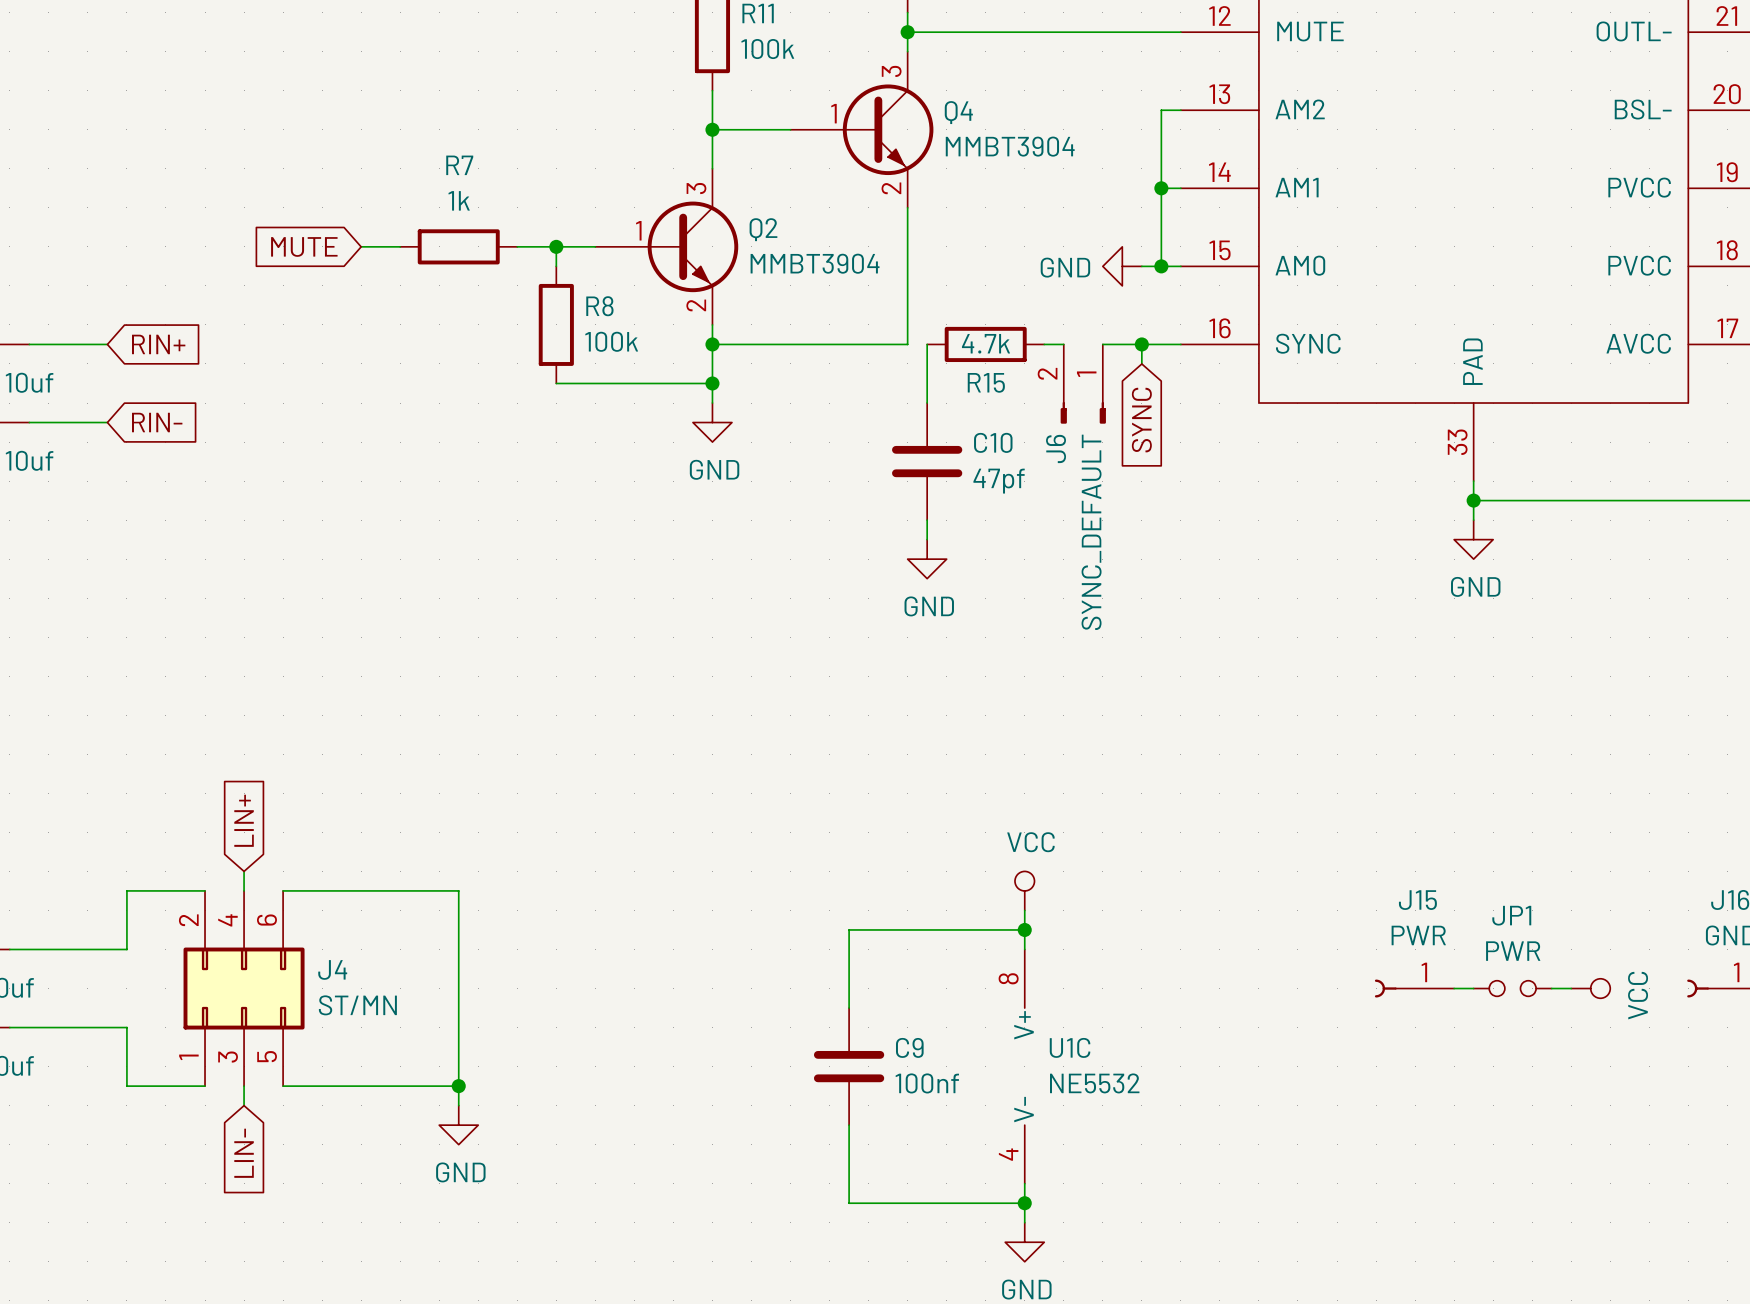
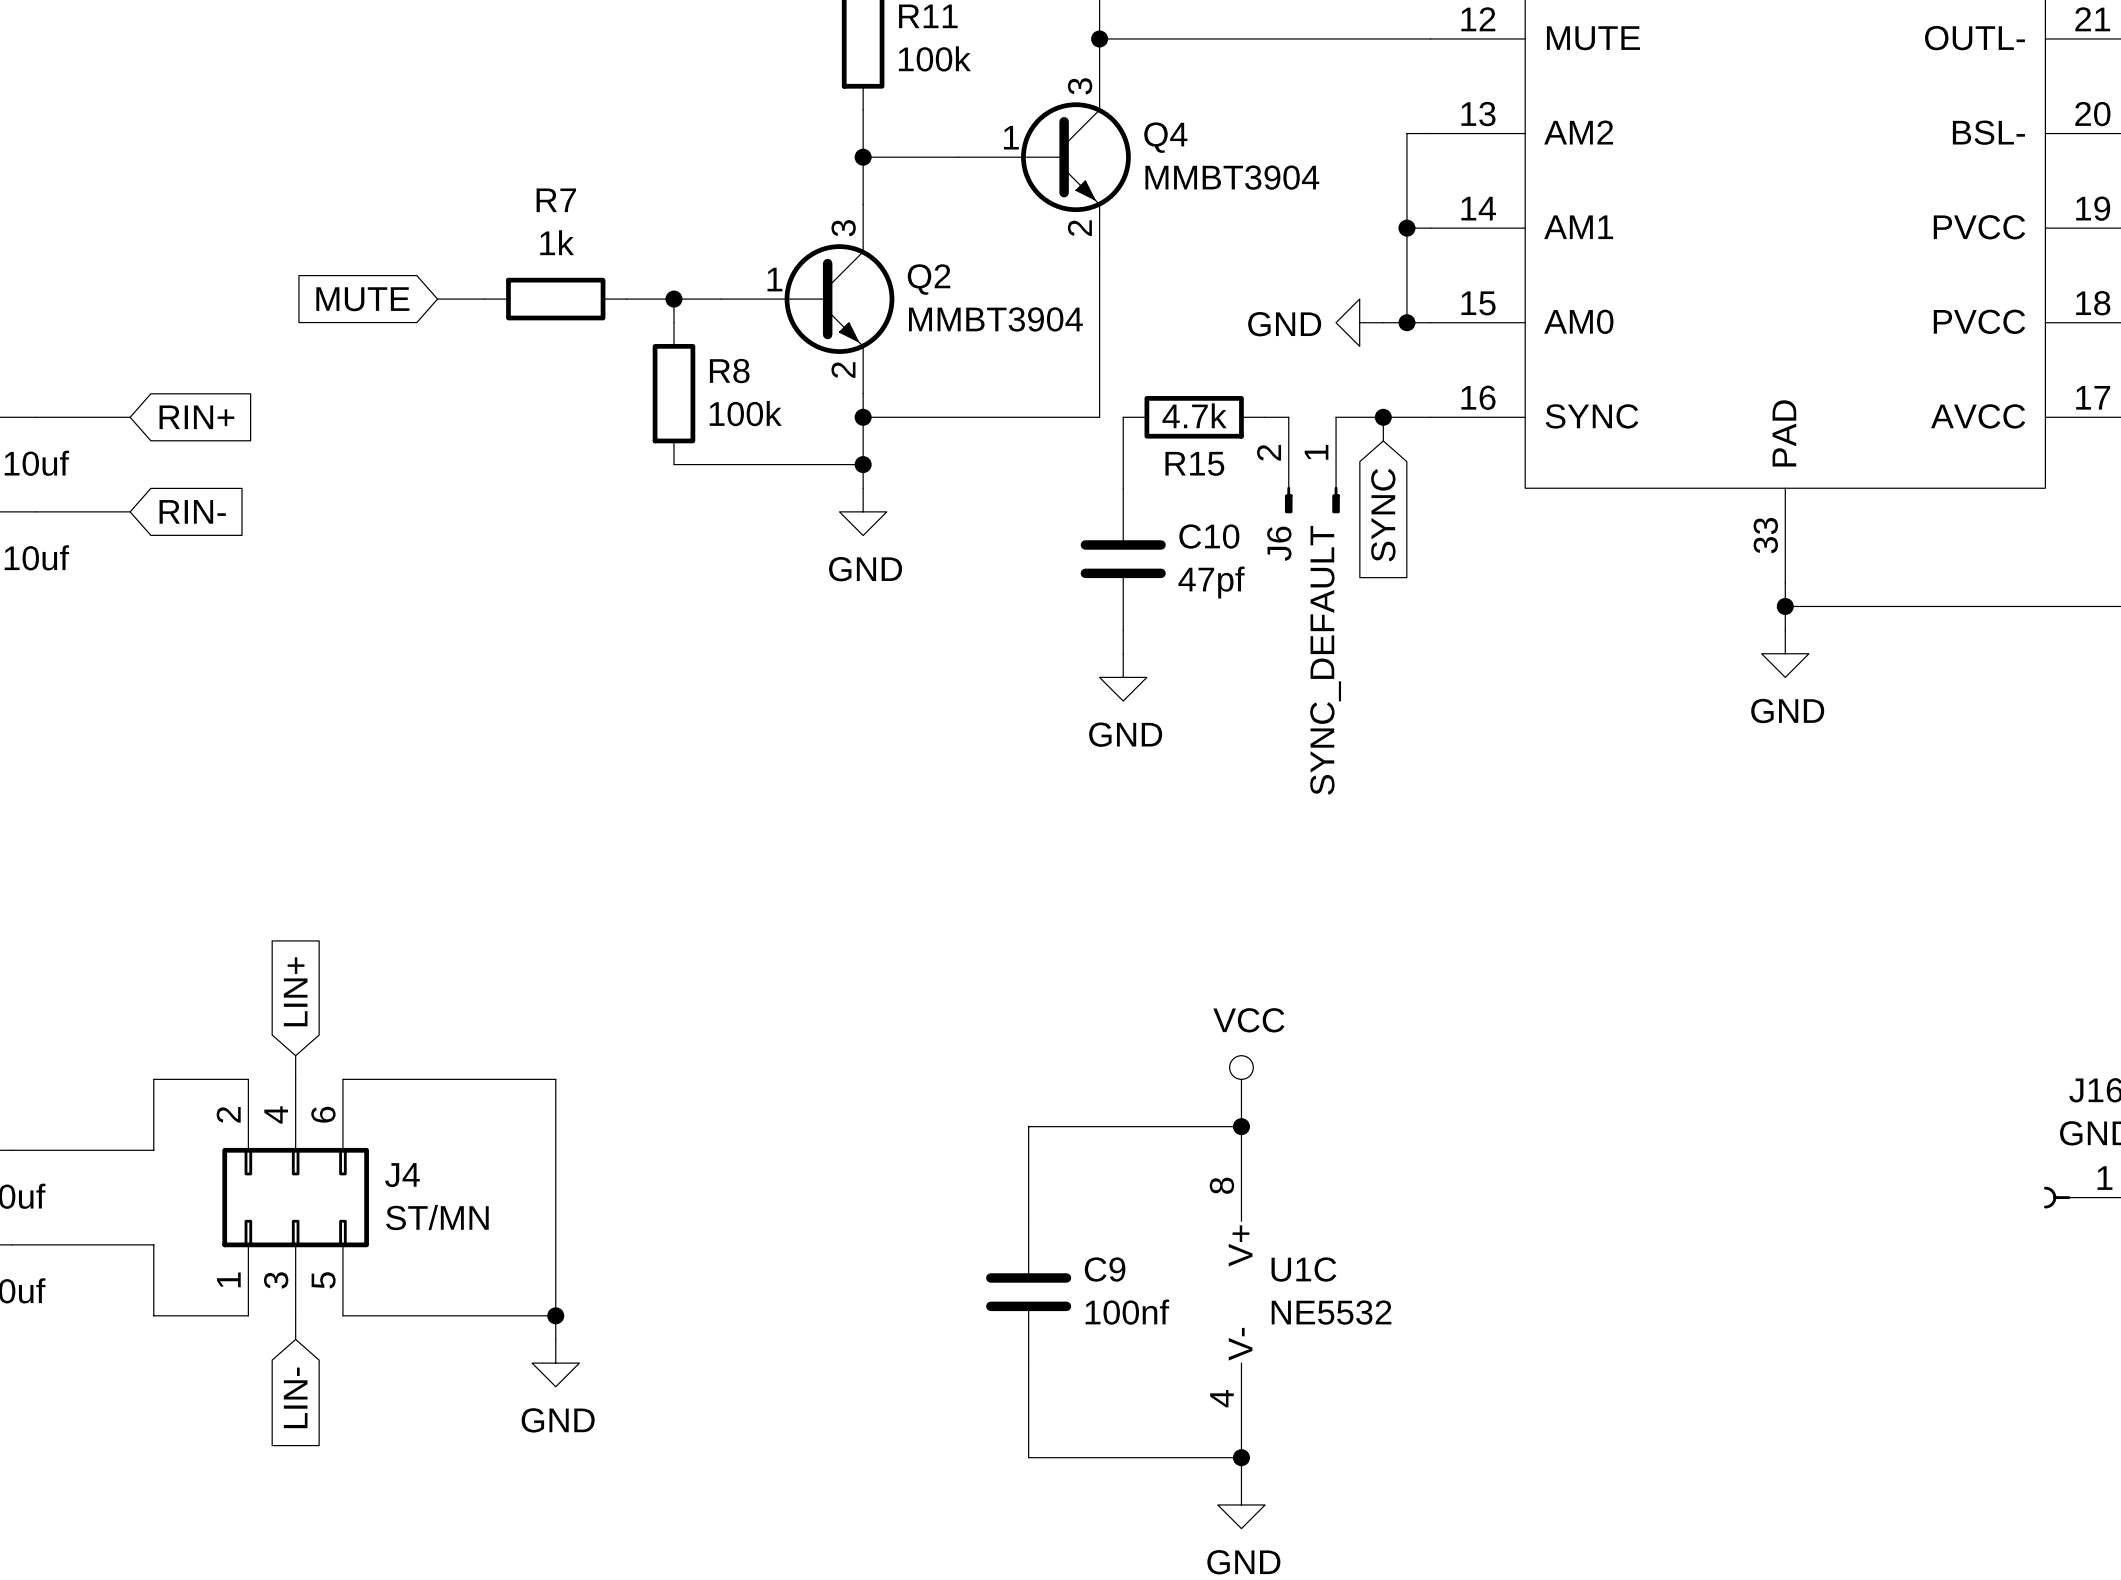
J15: PWR (1414, 988) -> none
wire: (1454, 988) (1473, 988) -> none
JP1: PWR (1512, 988) -> none
wire: (1551, 988) (1571, 988) -> none
power symbol: VCC (1590, 988) -> none

